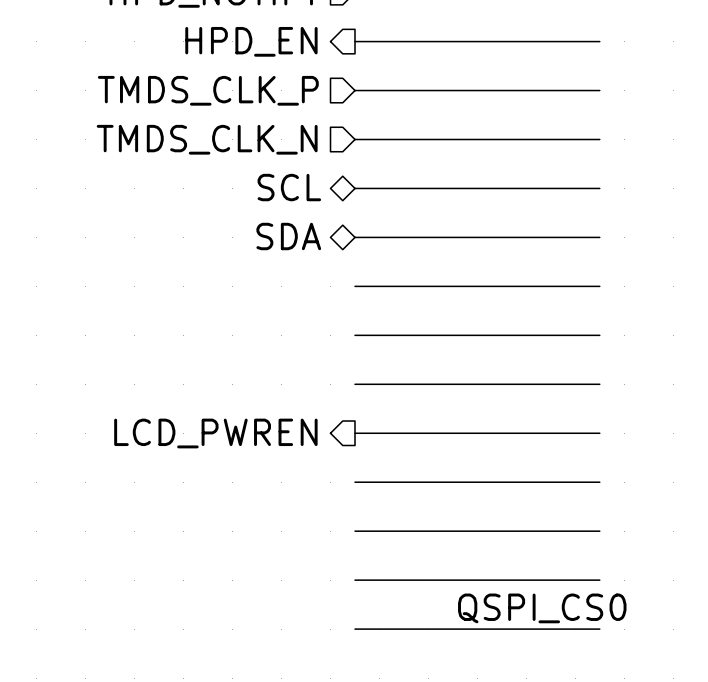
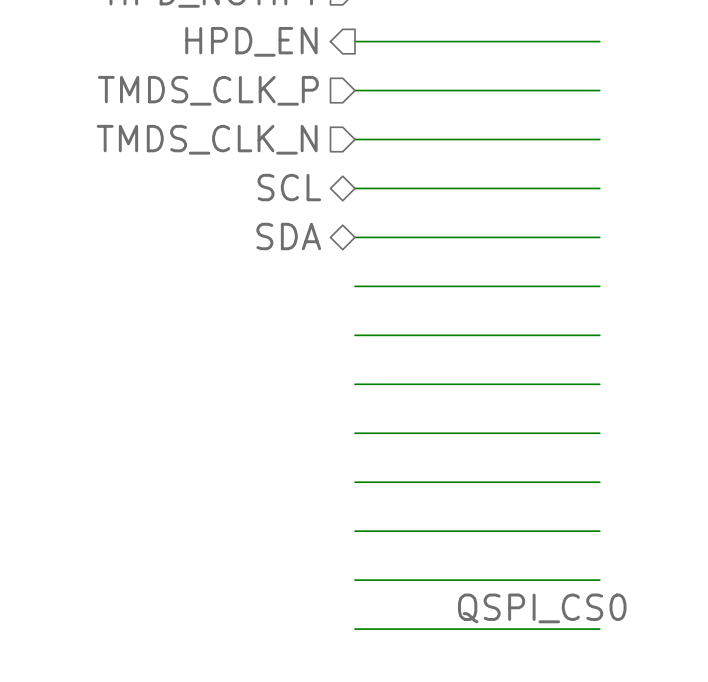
hierarchical label: LCD_PWREN (215, 433) -> none

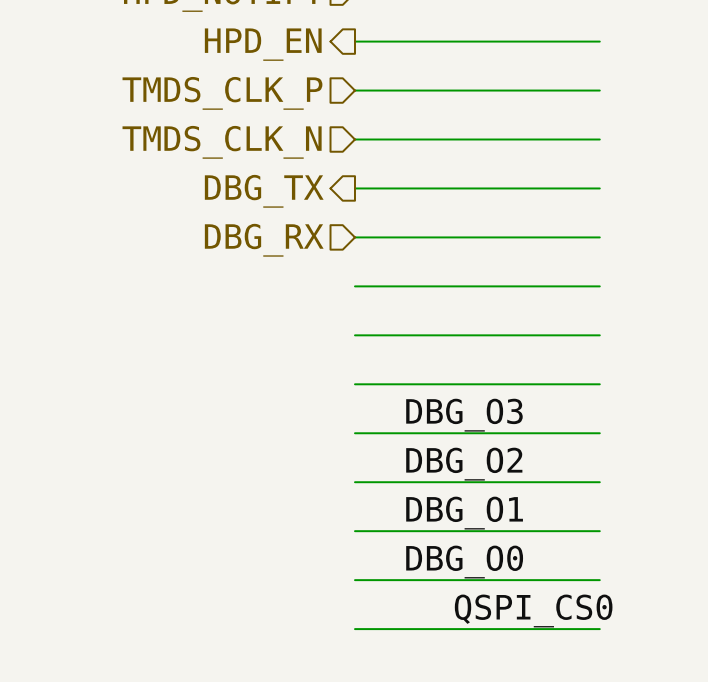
hierarchical label shape: bidirectional (289, 187) -> output (264, 191)
hierarchical label: SCL (289, 187) -> DBG_TX (264, 191)
hierarchical label shape: bidirectional (288, 236) -> input (264, 240)
hierarchical label: SDA (288, 236) -> DBG_RX (264, 240)
label: none -> DBG_O3 (464, 415)
label: none -> DBG_O2 (464, 464)
label: none -> DBG_O1 (464, 513)
label: none -> DBG_O0 (464, 562)

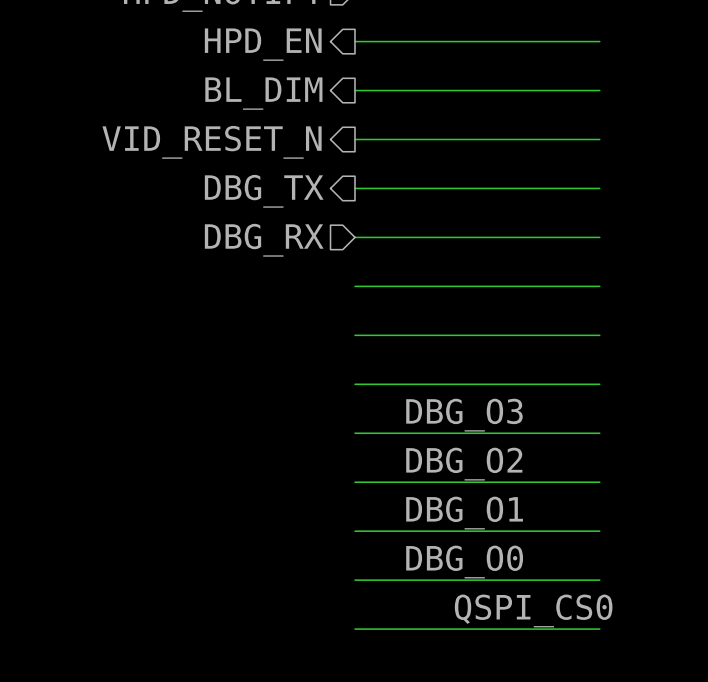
hierarchical label shape: input (222, 93) -> output (263, 93)
hierarchical label: TMDS_CLK_P (222, 93) -> BL_DIM (263, 93)
hierarchical label shape: input (222, 142) -> output (212, 142)
hierarchical label: TMDS_CLK_N (222, 142) -> VID_RESET_N (212, 142)

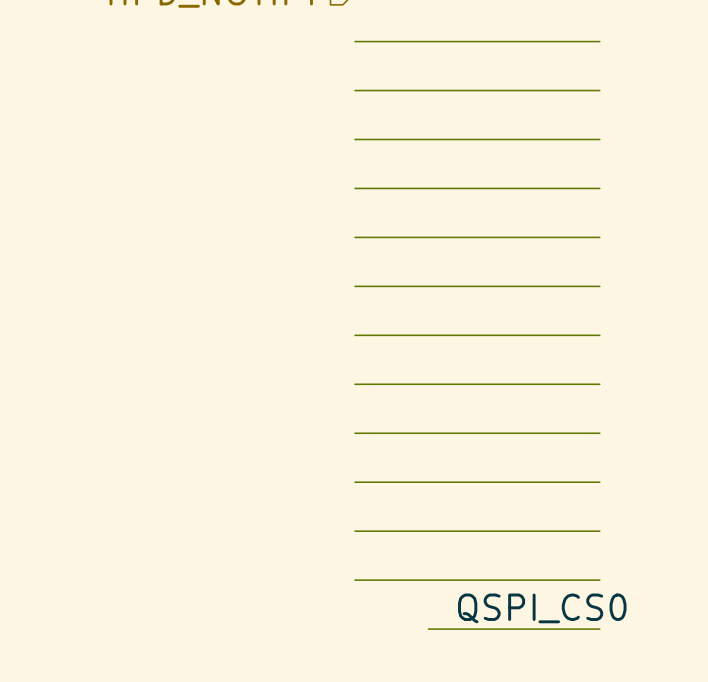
hierarchical label: HPD_EN (263, 44) -> none
hierarchical label: BL_DIM (263, 93) -> none
hierarchical label: VID_RESET_N (212, 142) -> none
hierarchical label: DBG_TX (264, 191) -> none
hierarchical label: DBG_RX (264, 240) -> none
label: DBG_O3 (464, 415) -> none
label: DBG_O2 (464, 464) -> none
label: DBG_O1 (464, 513) -> none
label: DBG_O0 (464, 562) -> none
wire: (354, 629) (428, 629) -> none

